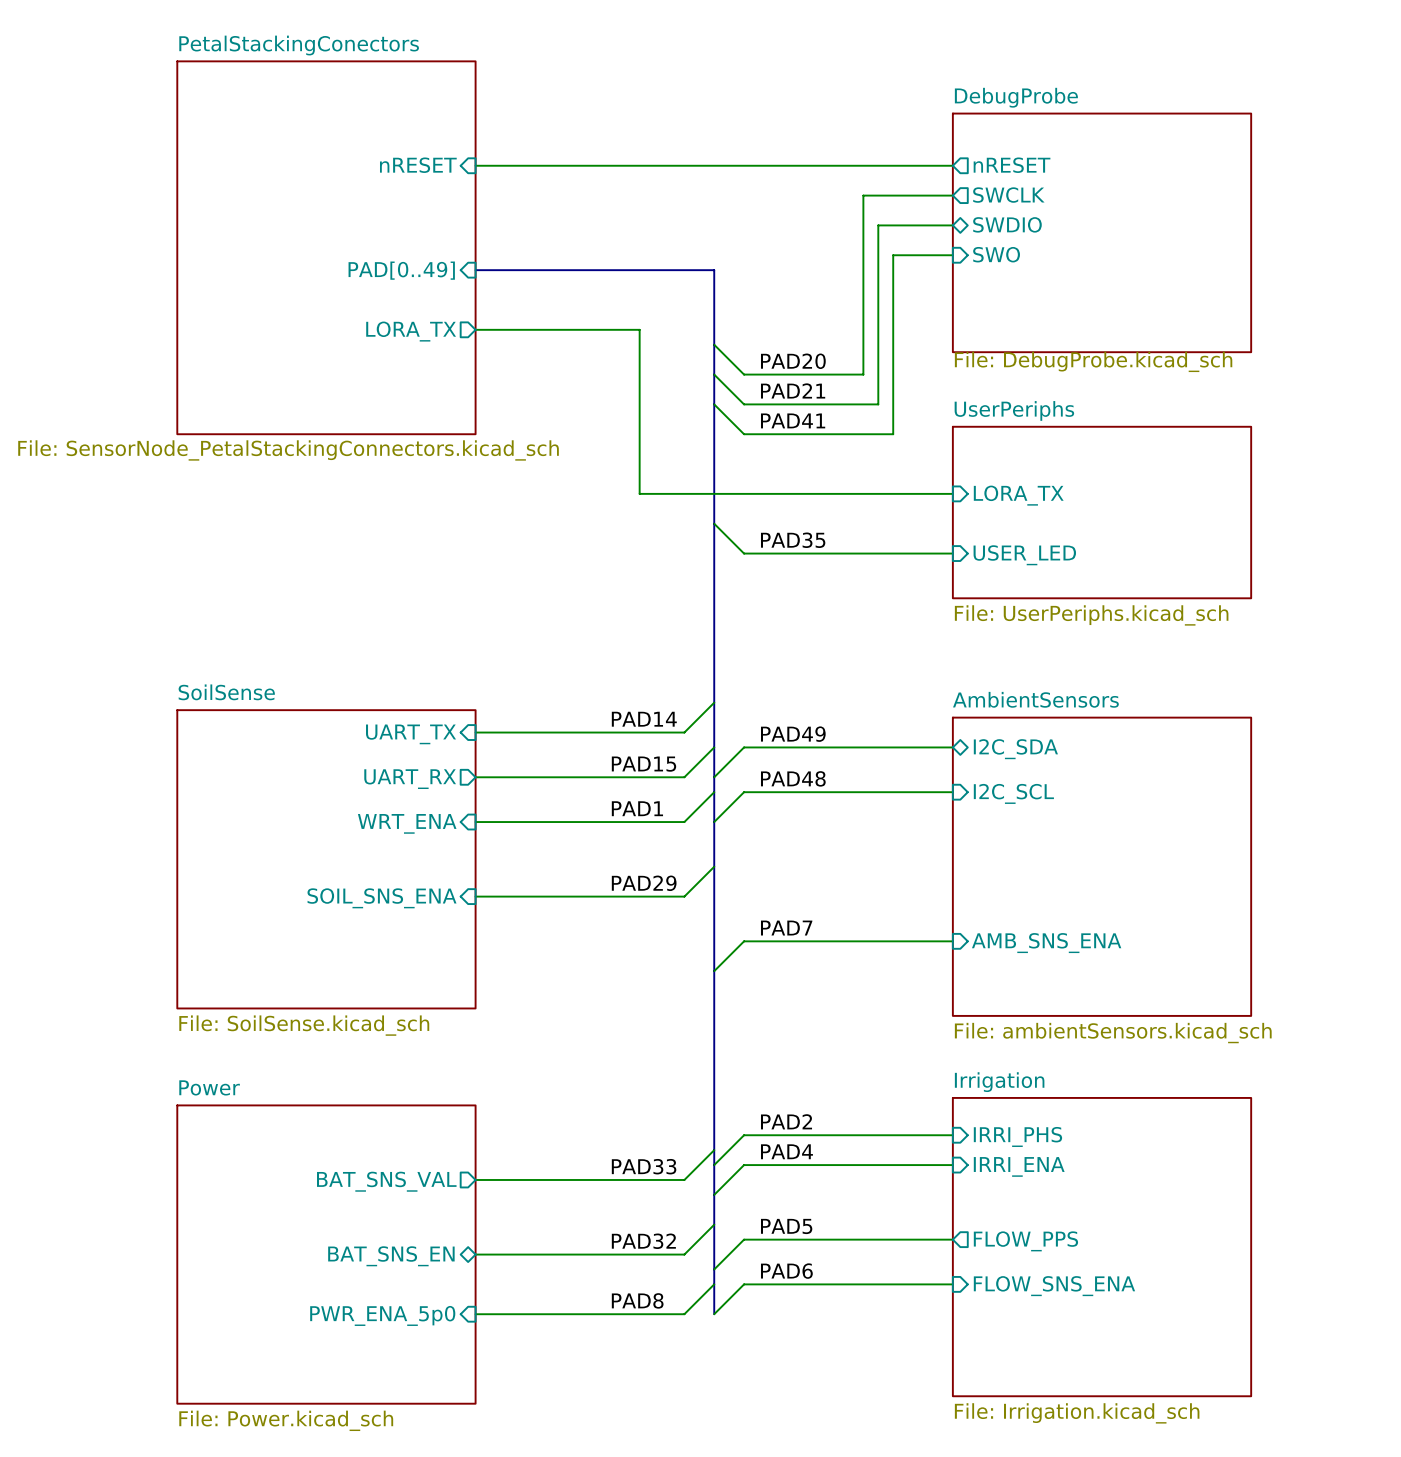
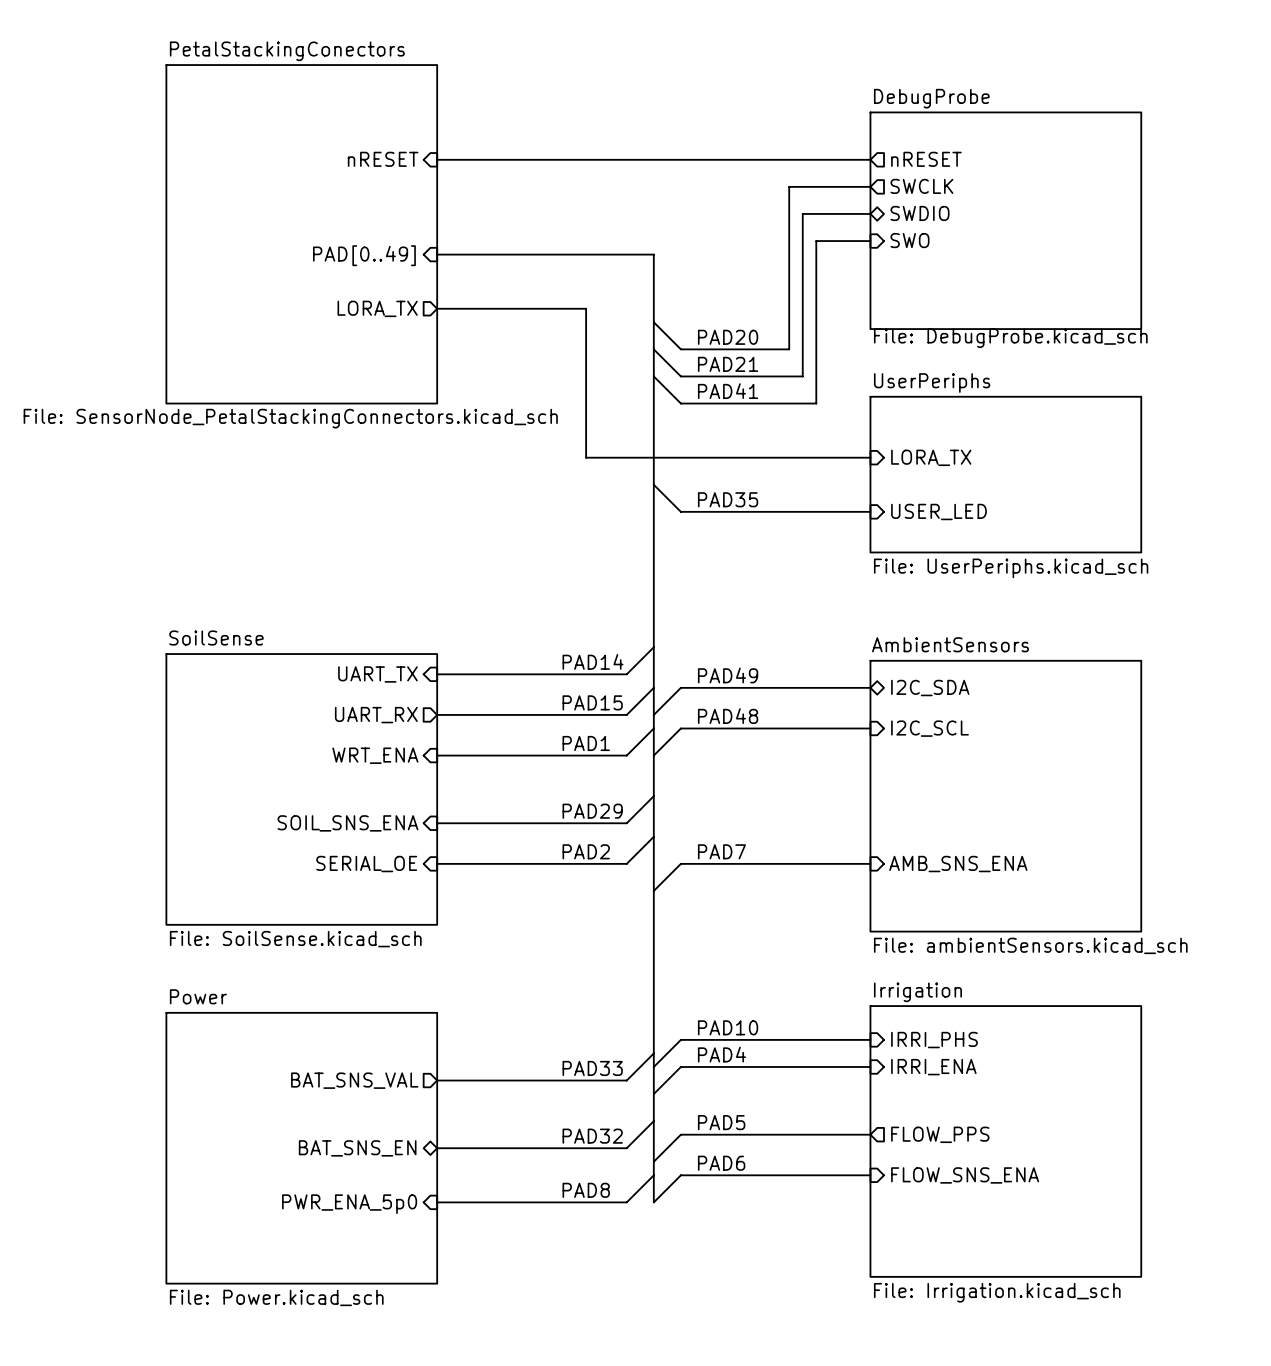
wire: none -> (653, 836) (626, 863) (437, 863)
label: none -> PAD2 (586, 851)
sheet pin: none -> SERIAL_OE (366, 864)
label: PAD2 (786, 1121) -> PAD10 (728, 1027)

